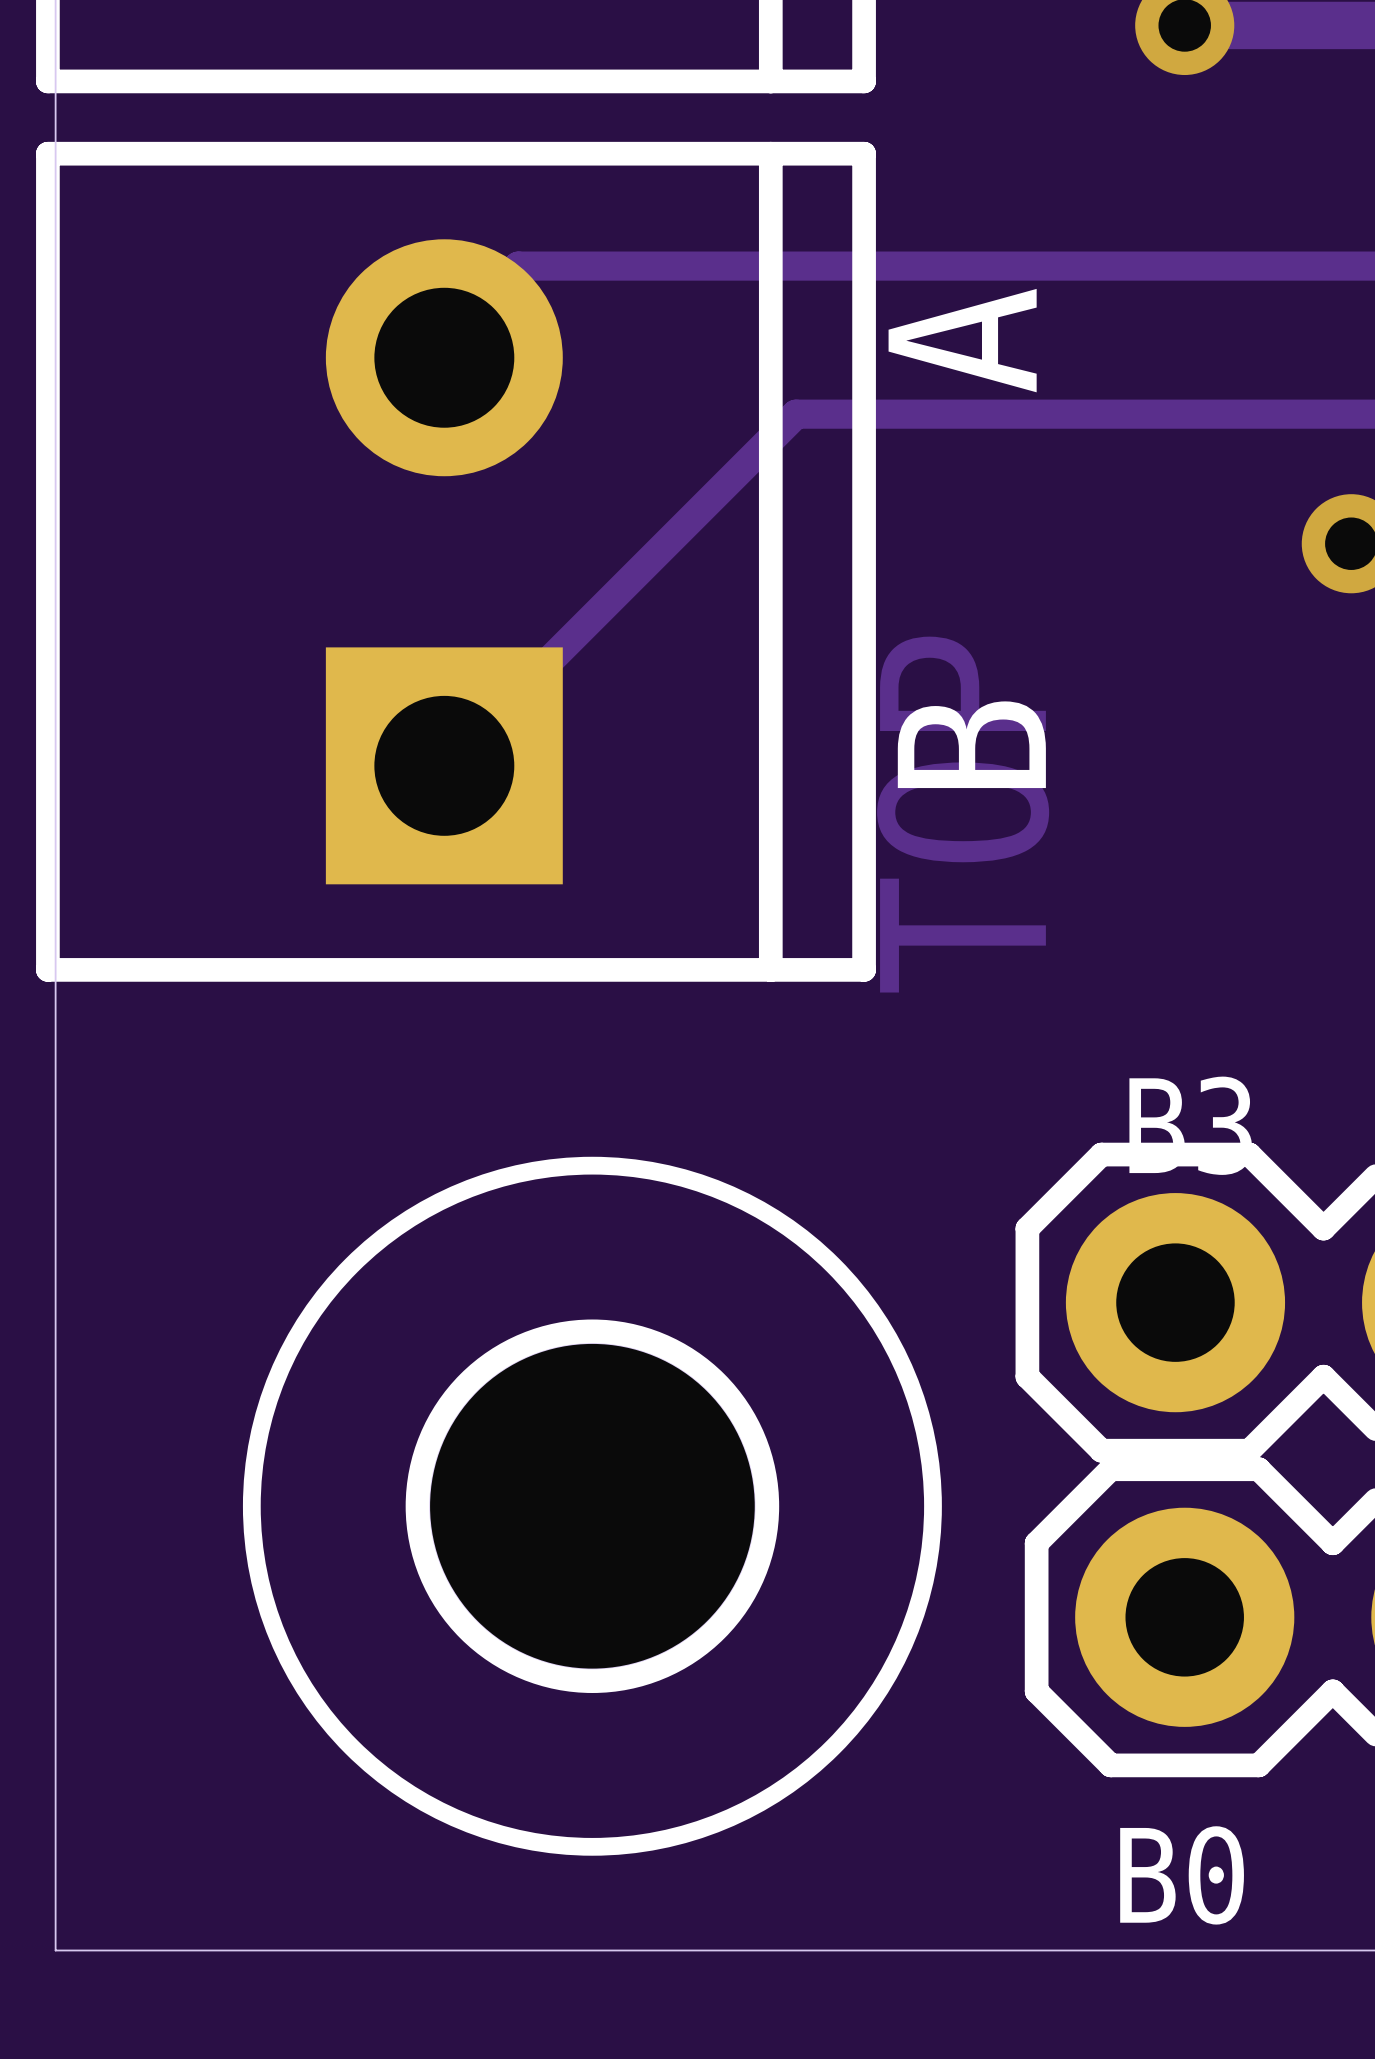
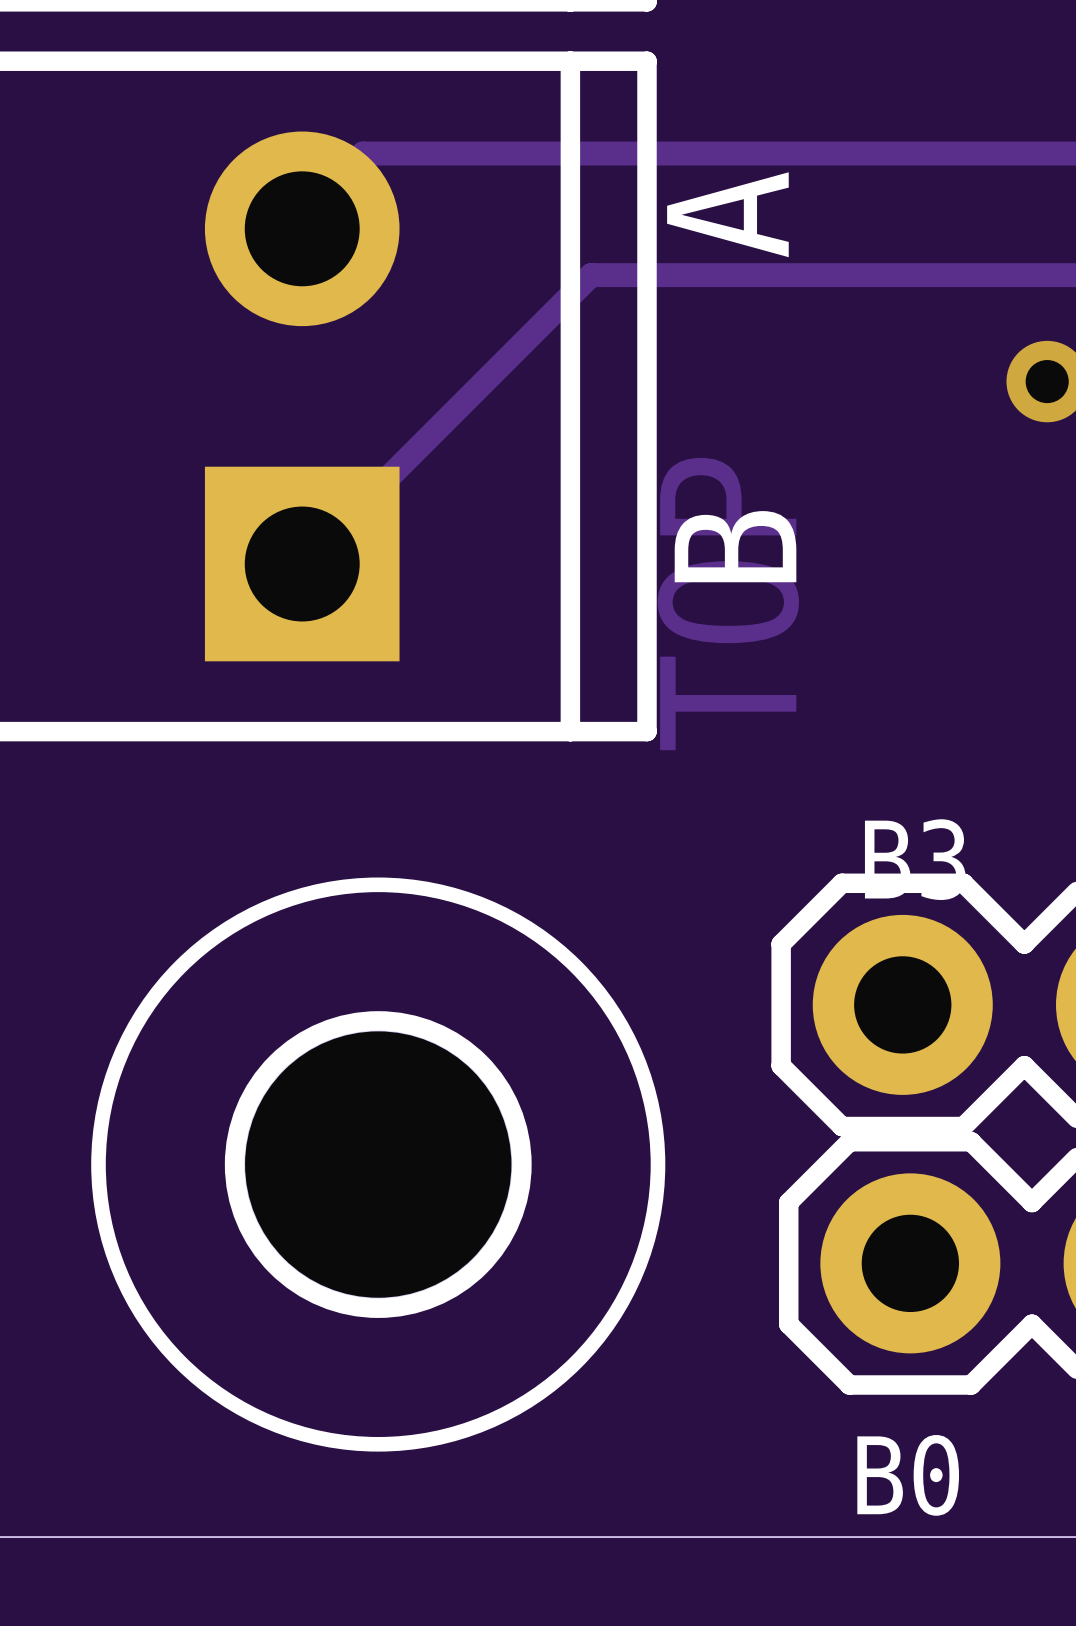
part position: (592, 1506) -> (378, 1164)

